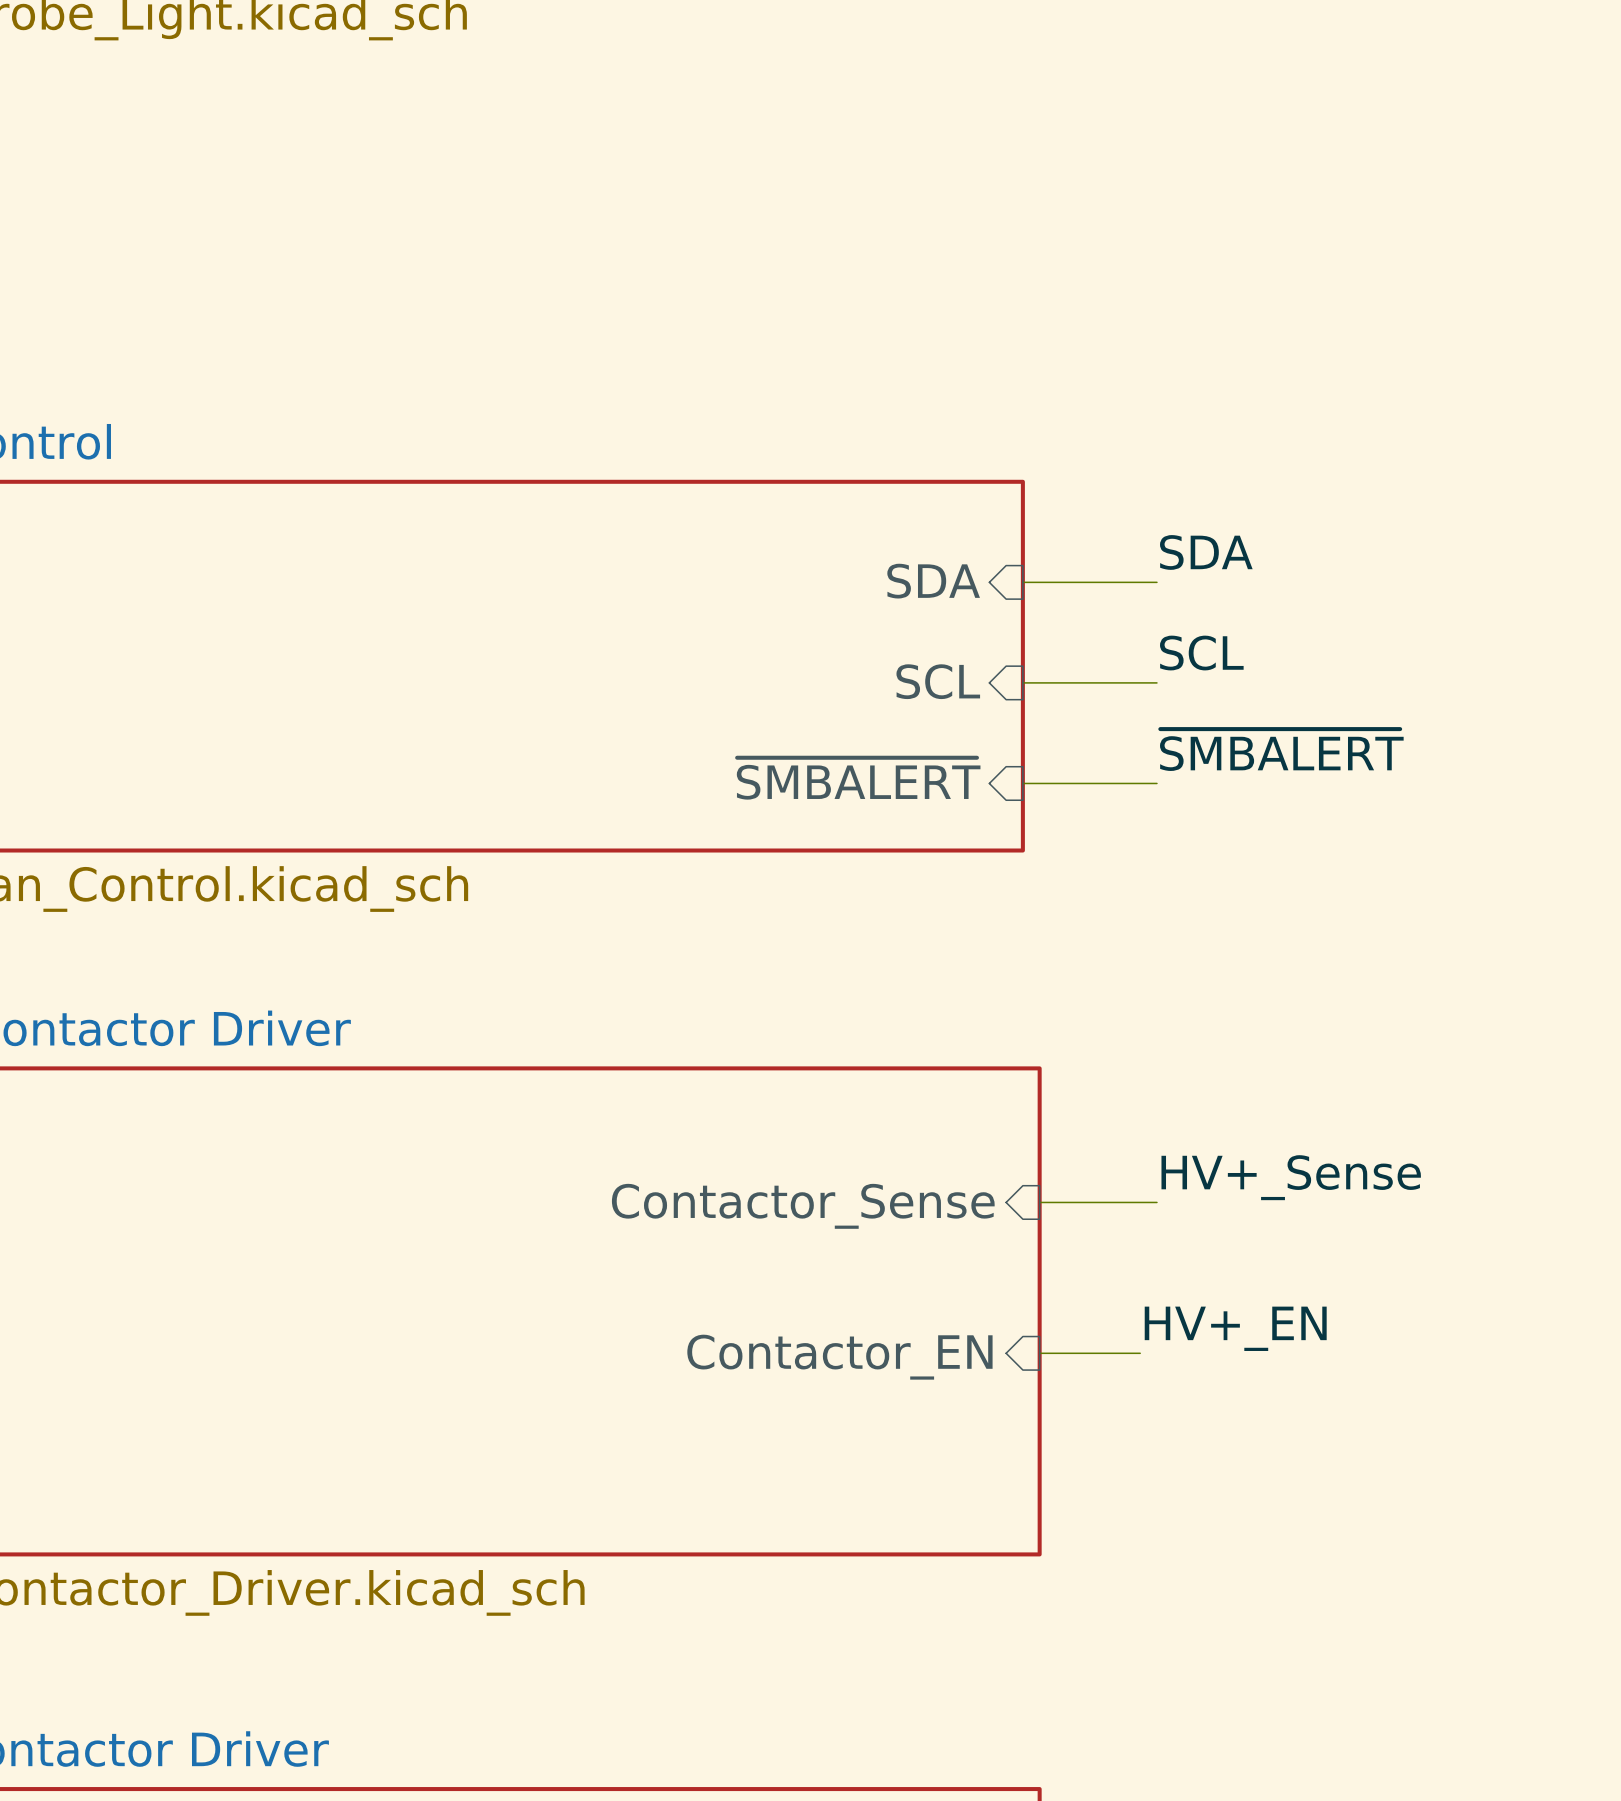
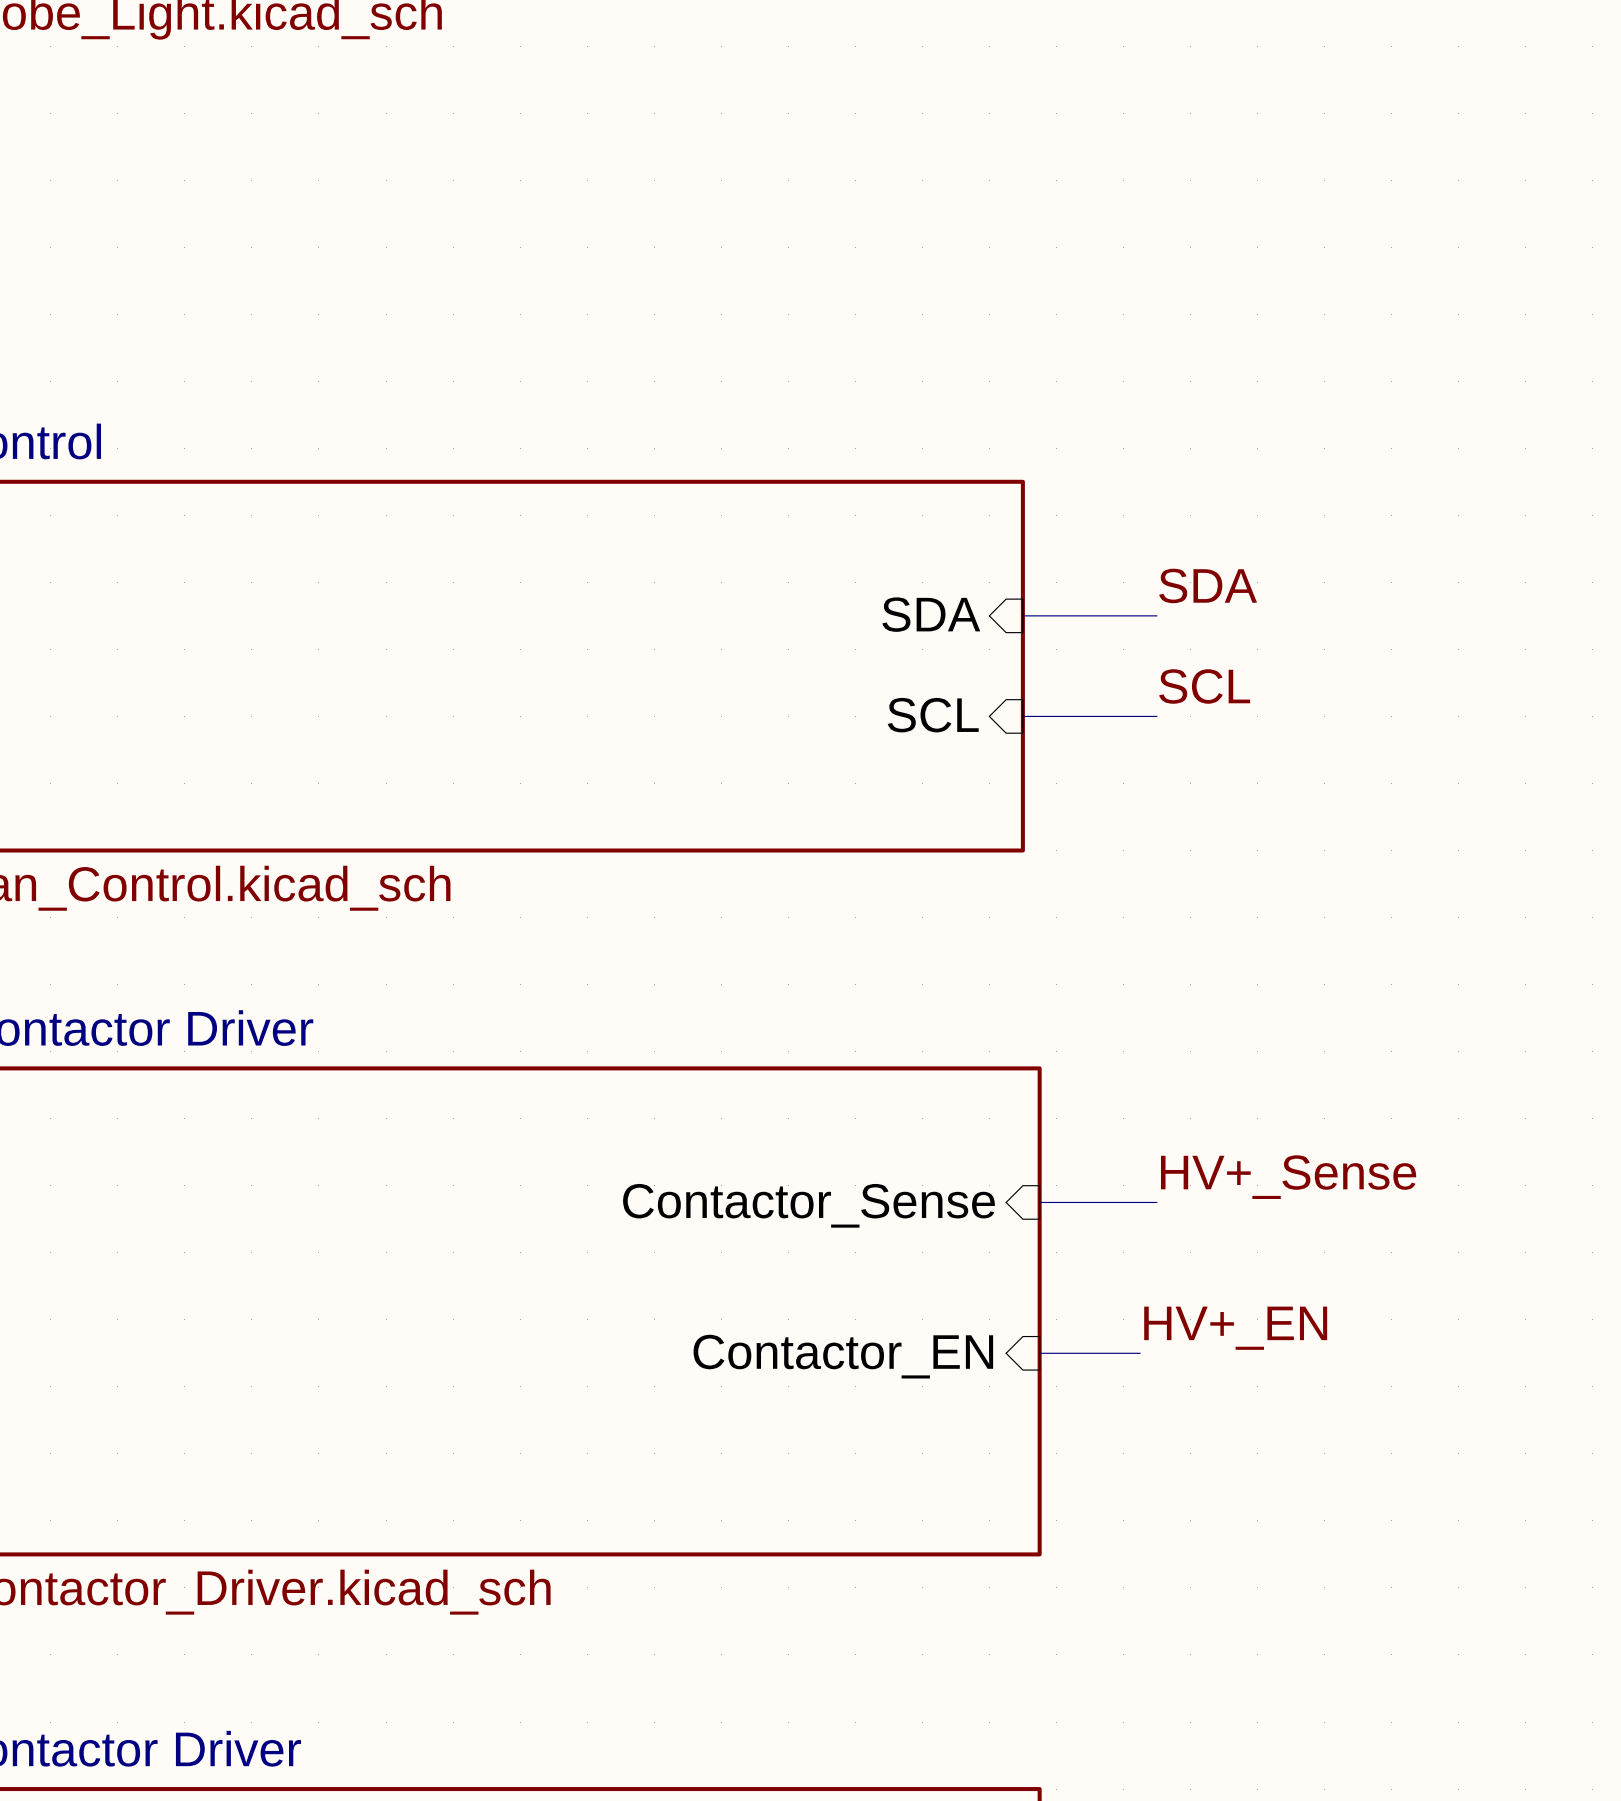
label position: SDA (1206, 552) -> SDA (1208, 585)
sheet pin position: SDA (933, 581) -> SDA (931, 614)
wire: (1022, 582) (1156, 582) -> (1022, 615) (1156, 615)
label position: SCL (1201, 653) -> SCL (1204, 686)
sheet pin position: SCL (938, 681) -> SCL (933, 715)
wire: (1022, 682) (1156, 682) -> (1022, 716) (1156, 716)
label: ~{SMBALERT} (1281, 750) -> none
sheet pin: ~{SMBALERT} (858, 778) -> none
wire: (1022, 783) (1156, 783) -> none

